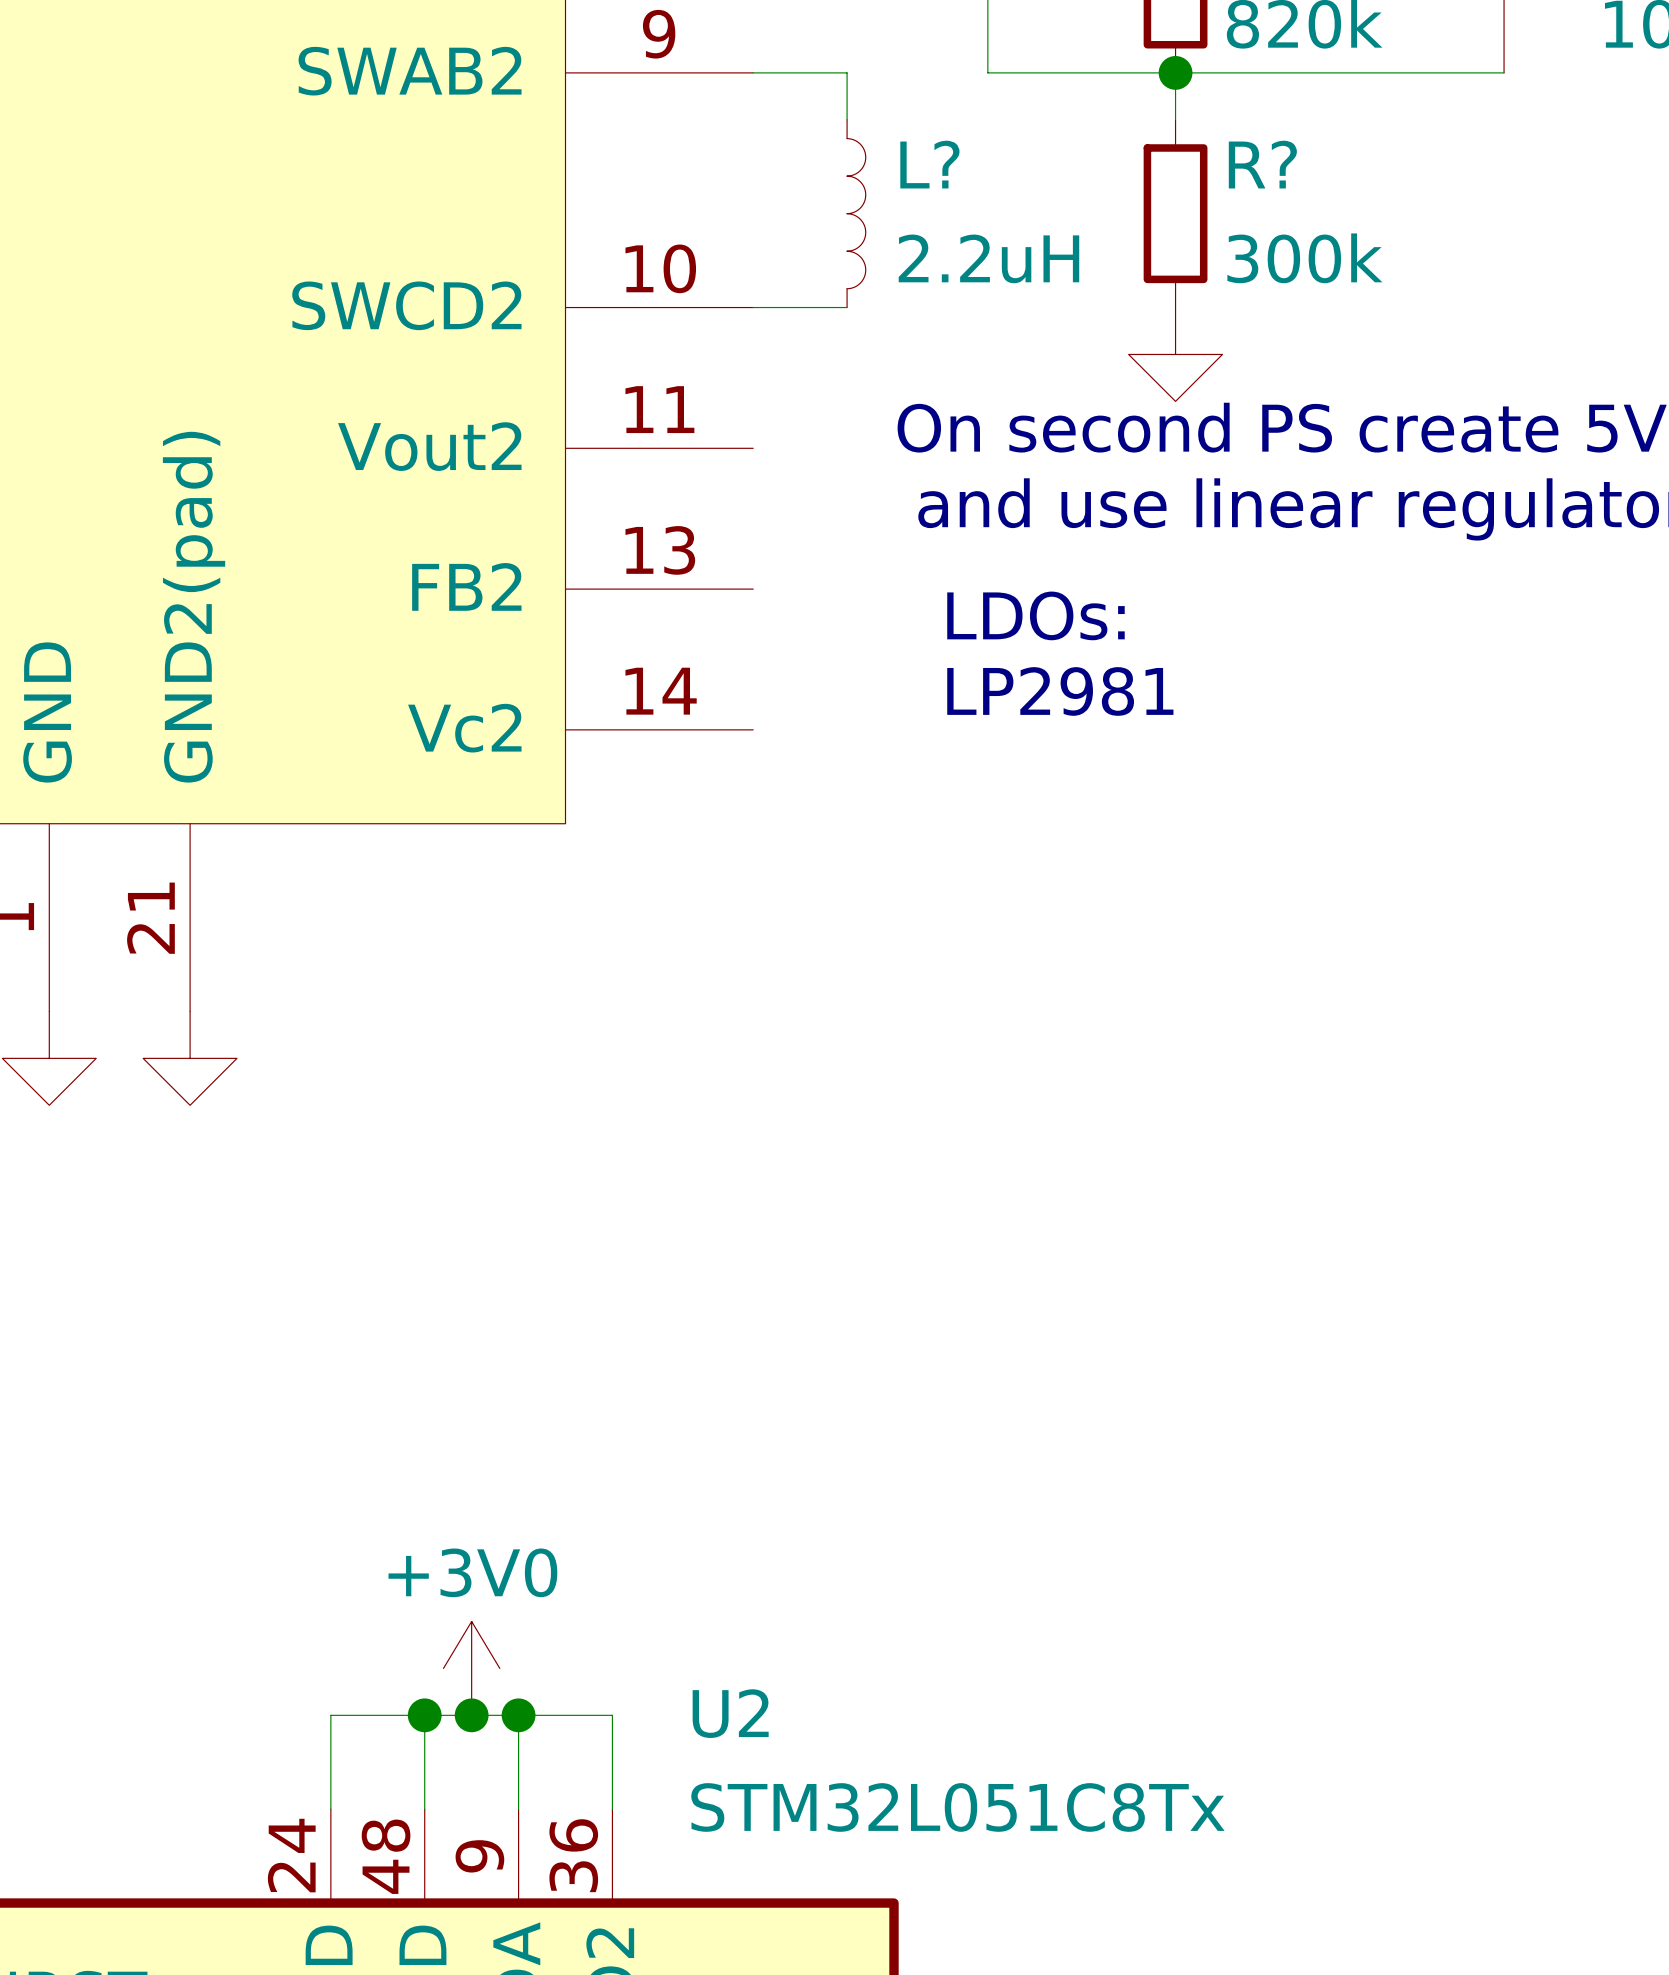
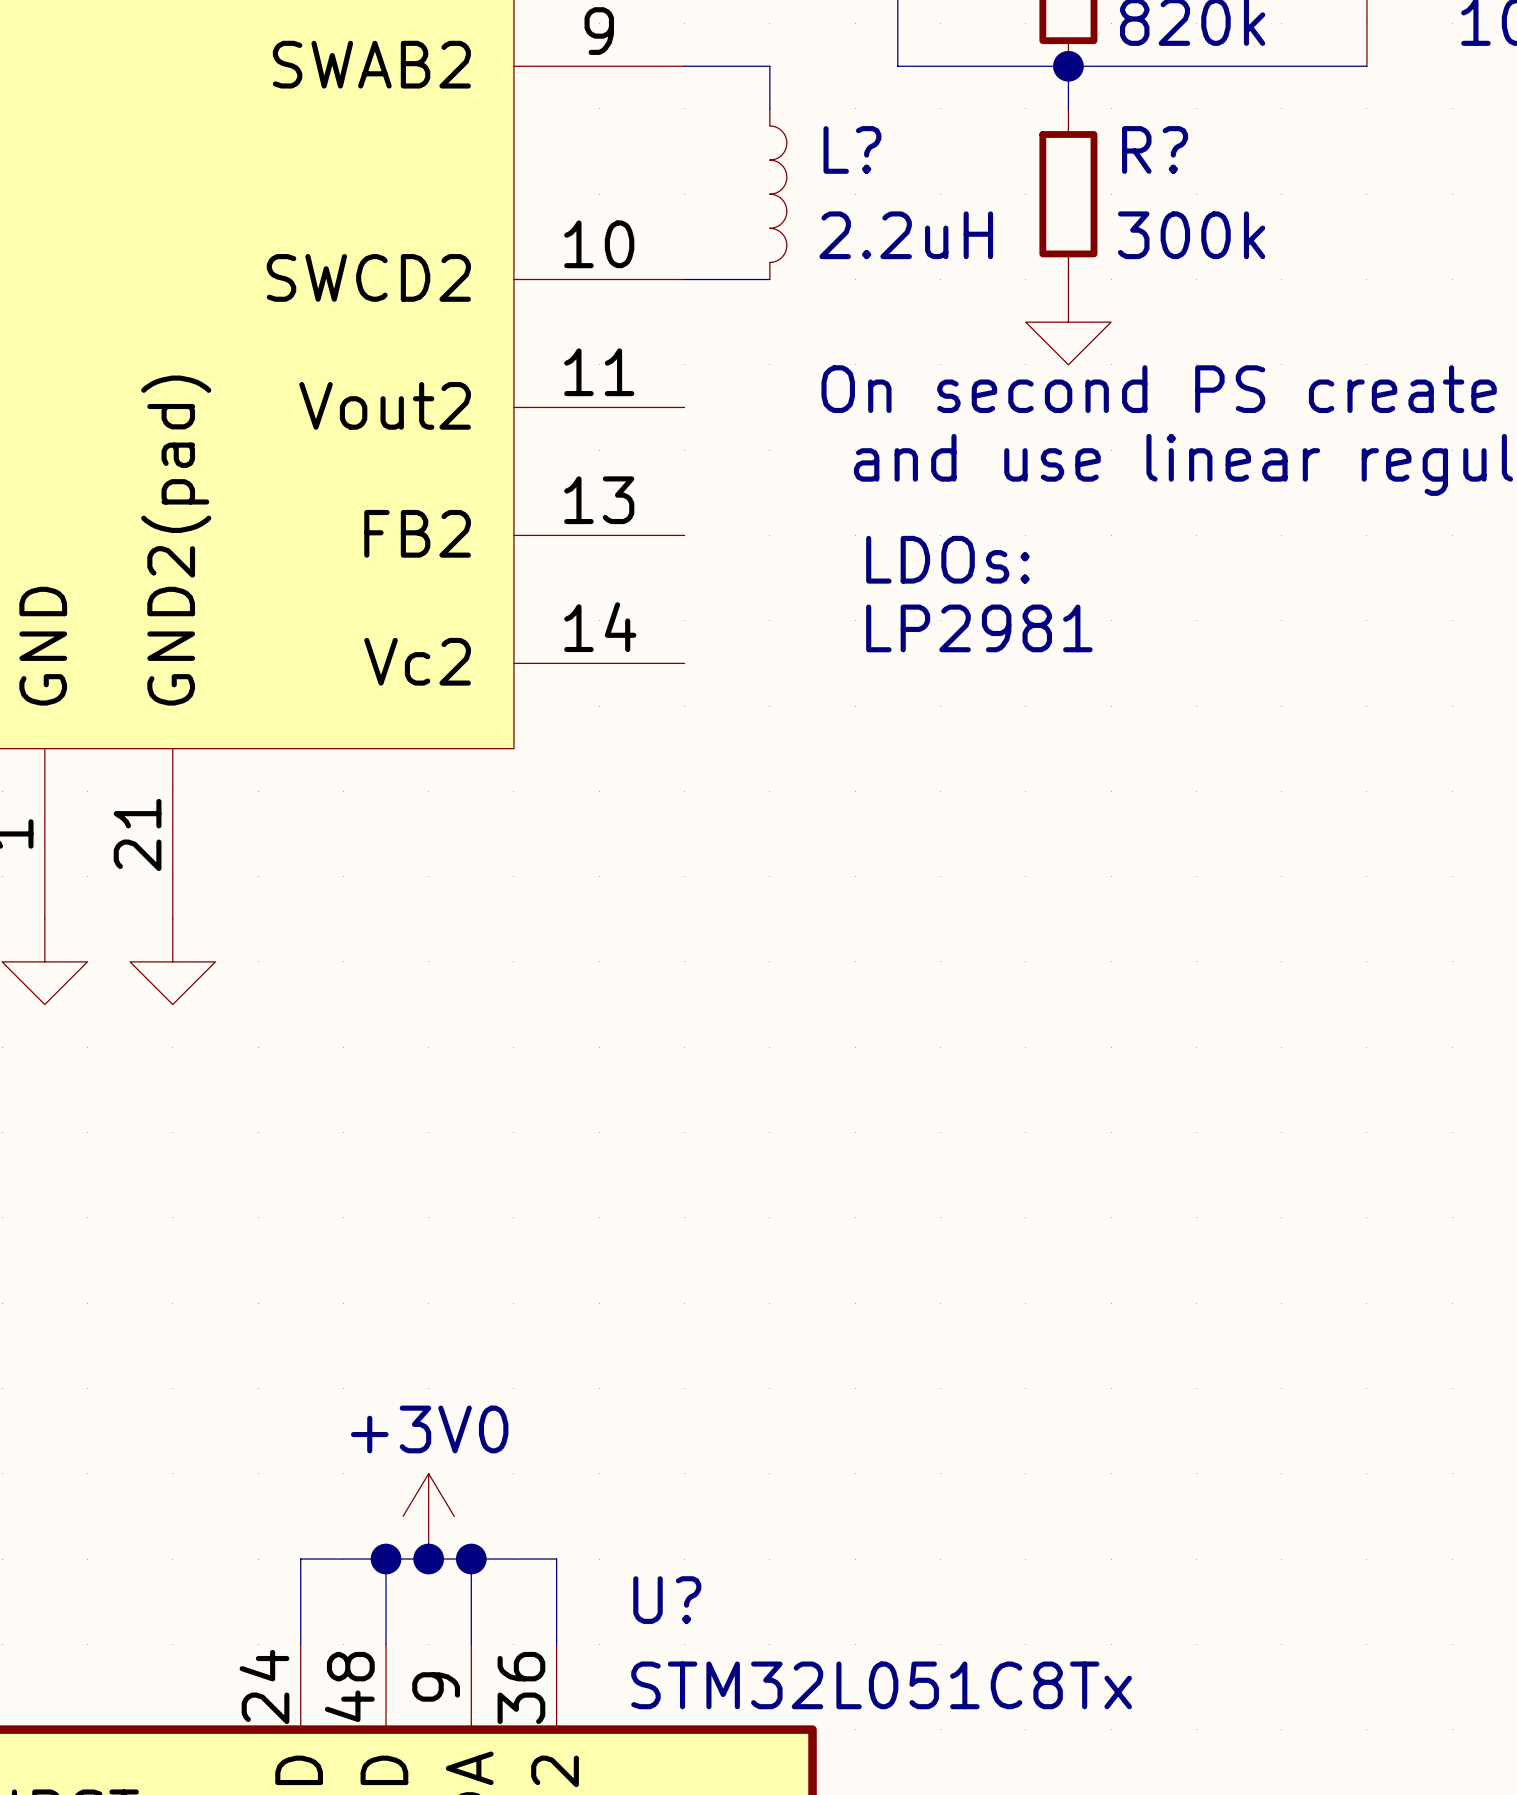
U2 name: U2 (730, 1713) -> U? (667, 1600)
U2 value position: STM32L051C8Tx (957, 1807) -> STM32L051C8Tx (881, 1685)

